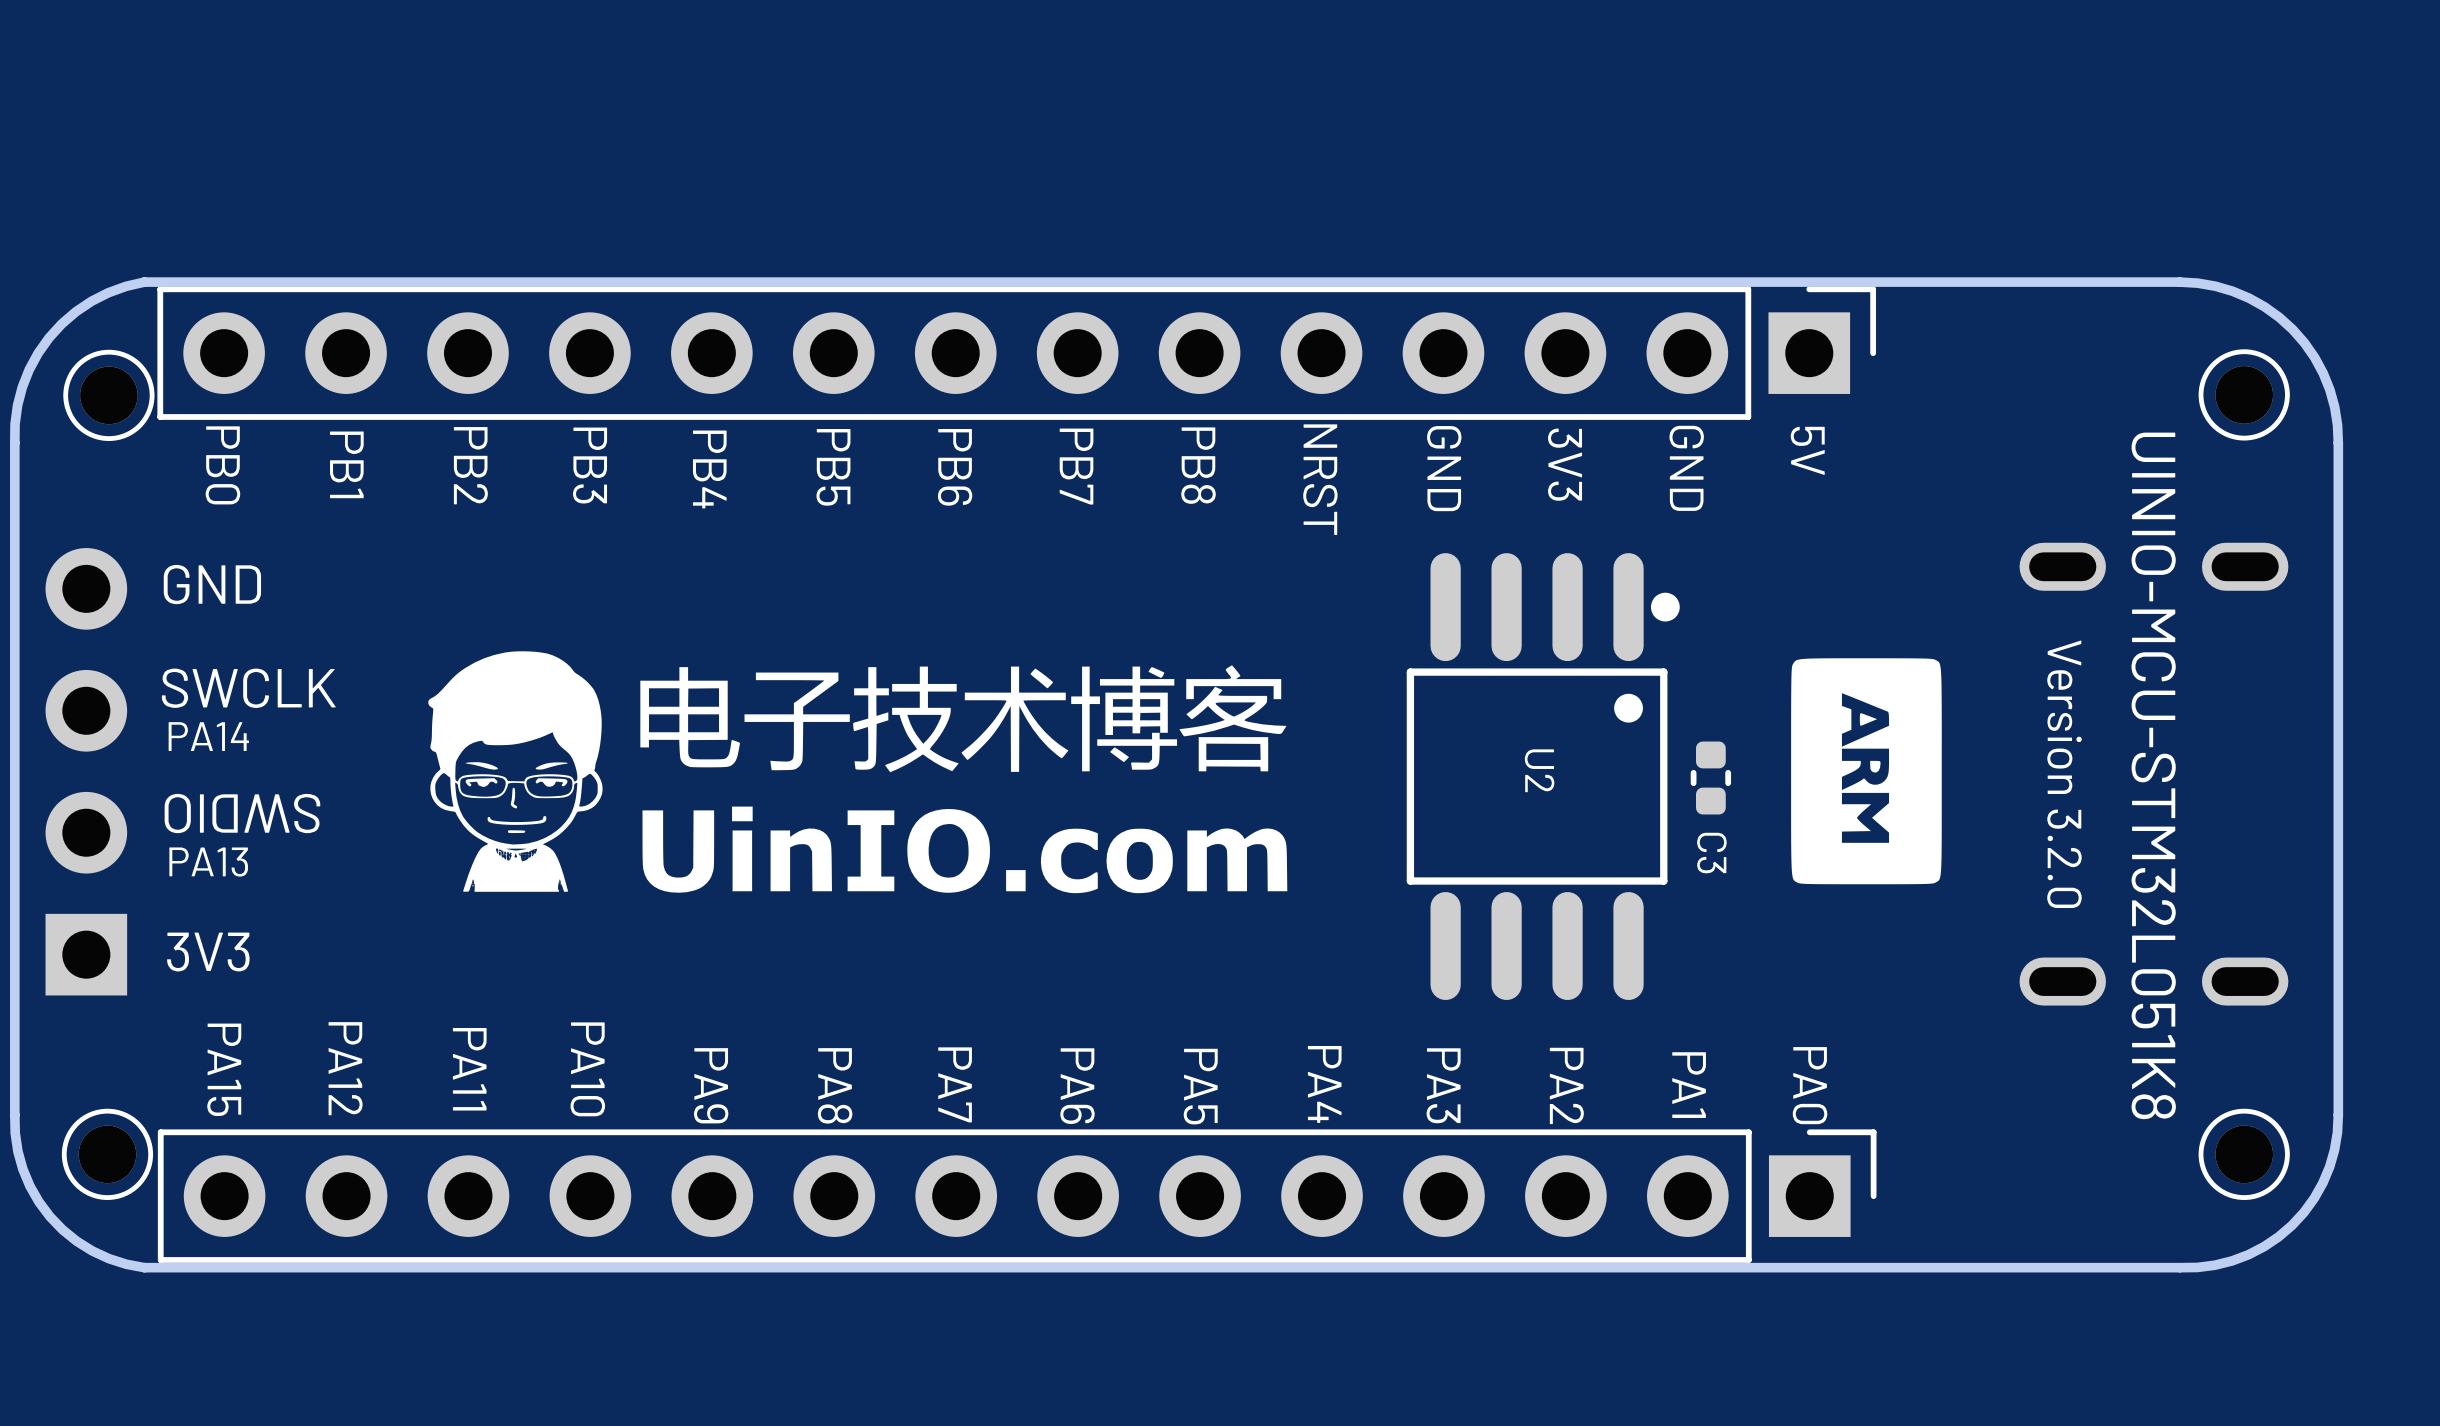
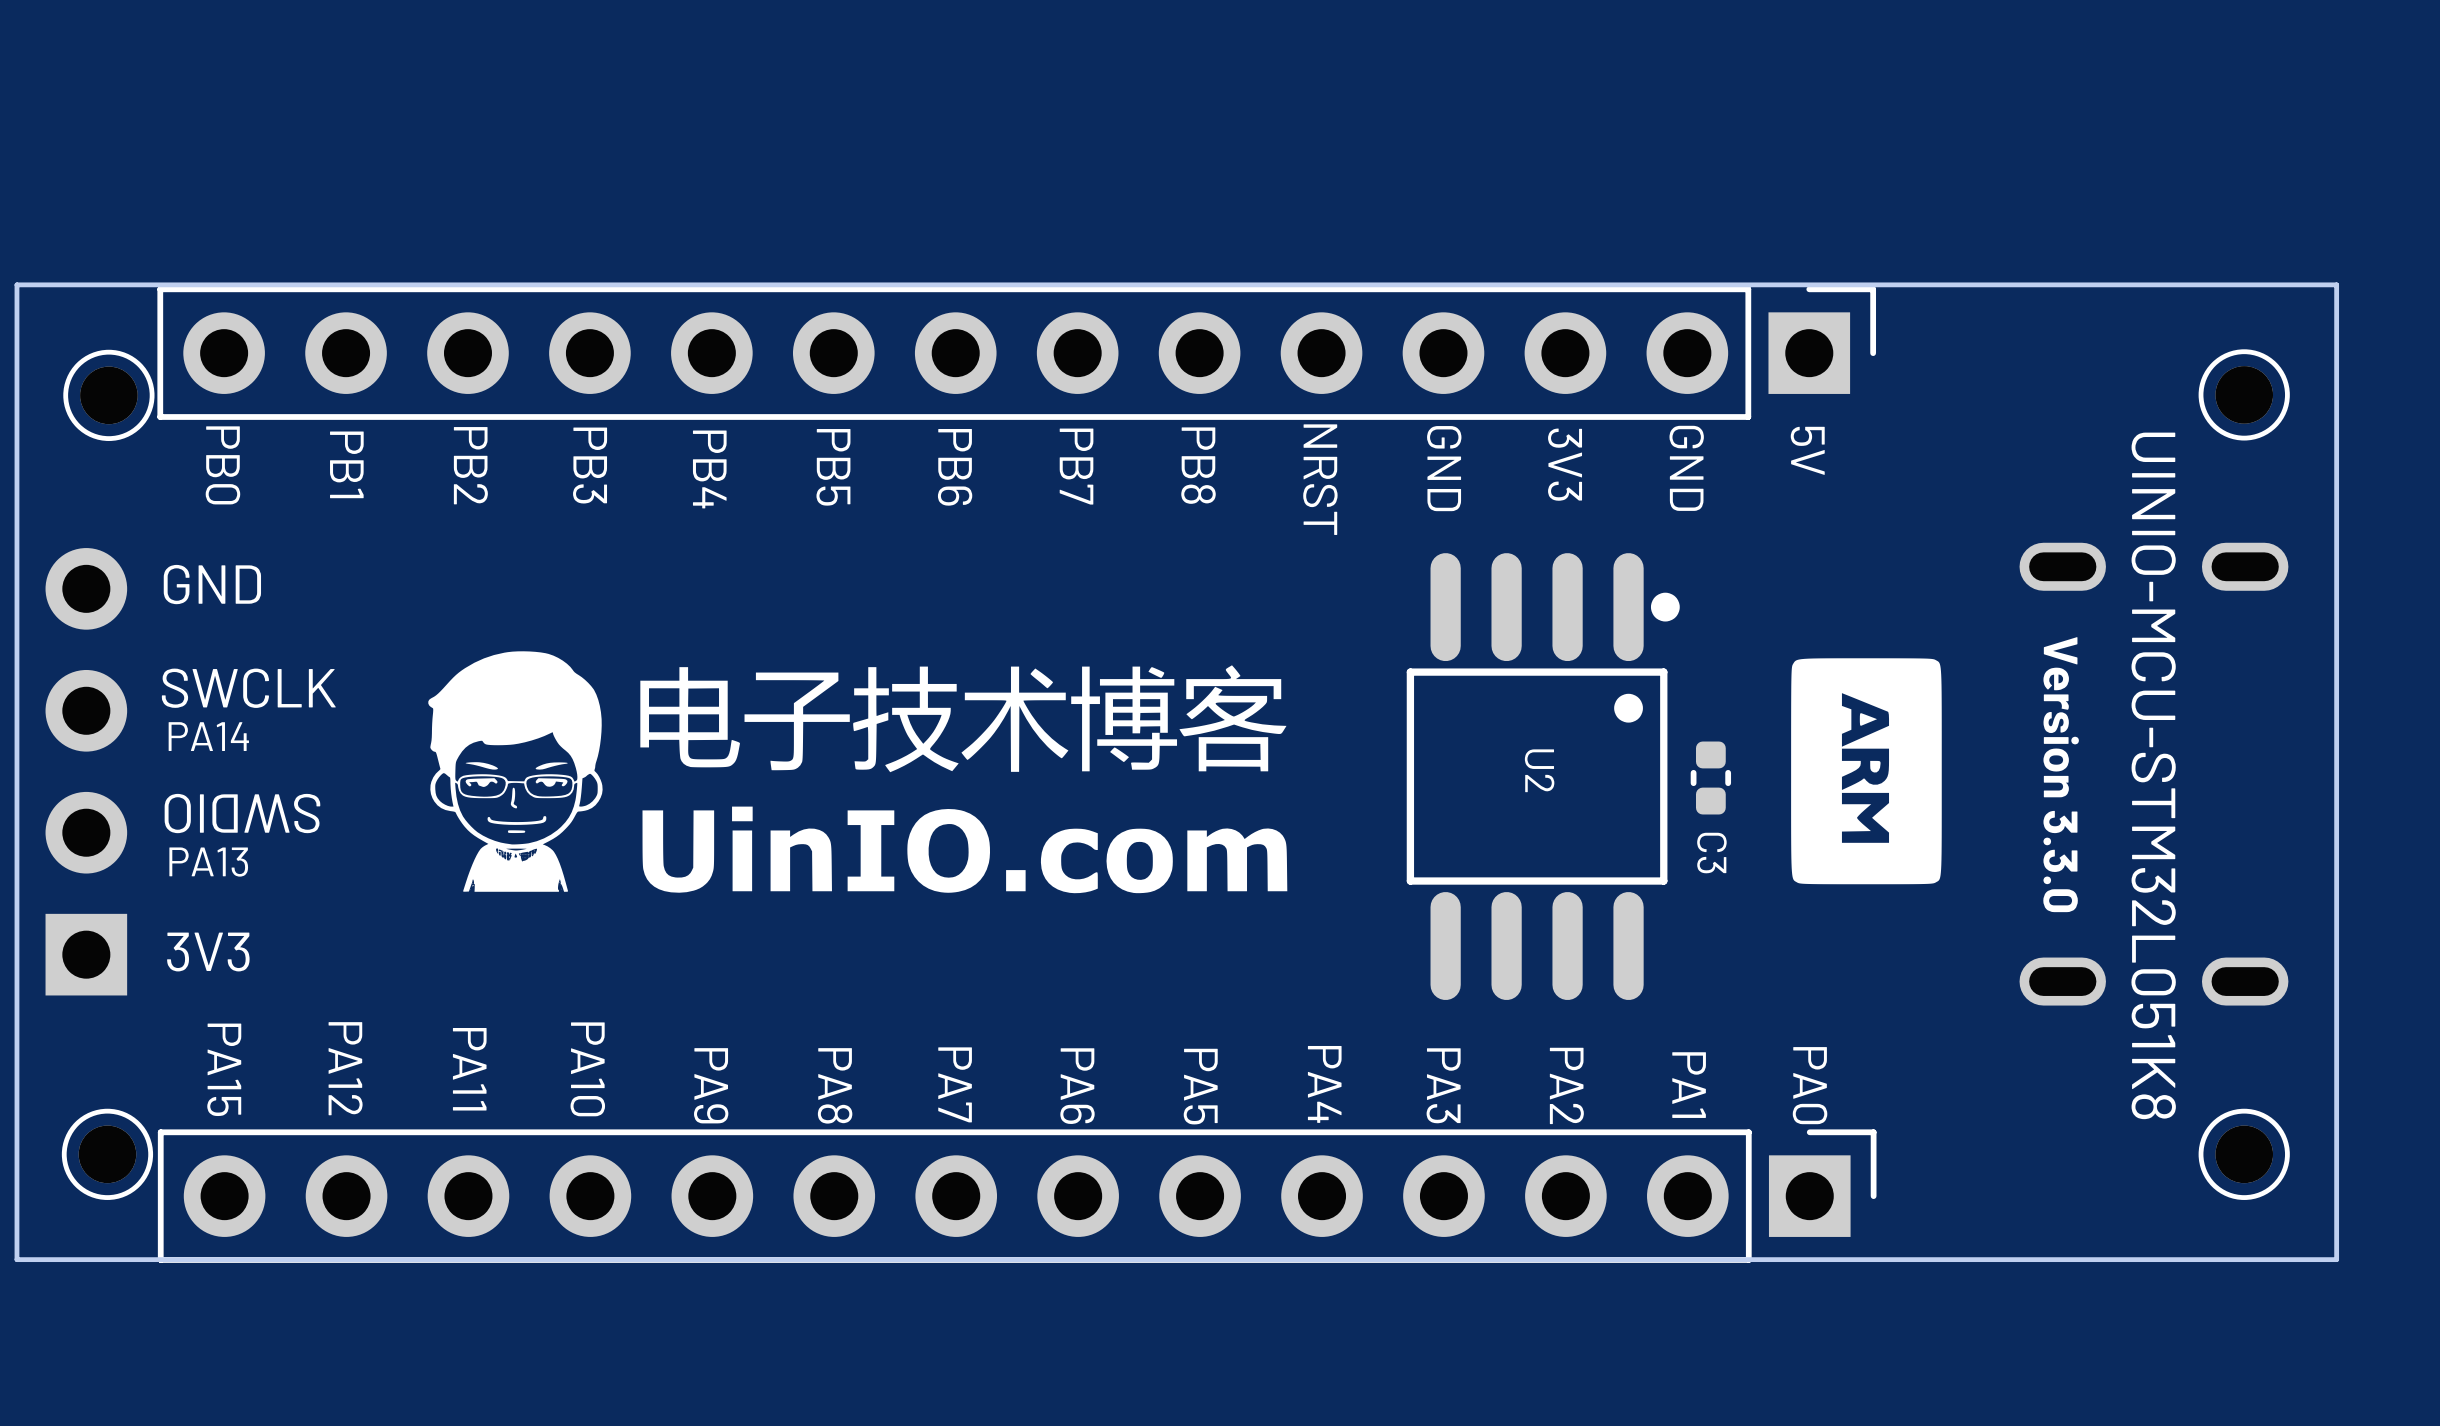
board edge: (2179, 282) (144, 282) (108, 292) (75, 311) (49, 337) (29, 369) (22, 387) (15, 424) (14, 1115) (17, 1151) (22, 1169) (38, 1201) (49, 1216) (76, 1241) (108, 1258) (144, 1267) (2179, 1267) (2214, 1265) (2248, 1254) (2278, 1236) (2303, 1212) (2314, 1198) (2329, 1166) (2337, 1132) (2337, 425) (2334, 407) (2323, 373) (2314, 357) (2292, 329) (2264, 306) (2249, 298) (2215, 286) (2179, 282) -> (2336, 284) (2336, 1259) (16, 1259) (16, 284) (2336, 284)
text: Version 3.2.0 (2064, 774) -> Version 3.3.0 (2061, 774)

